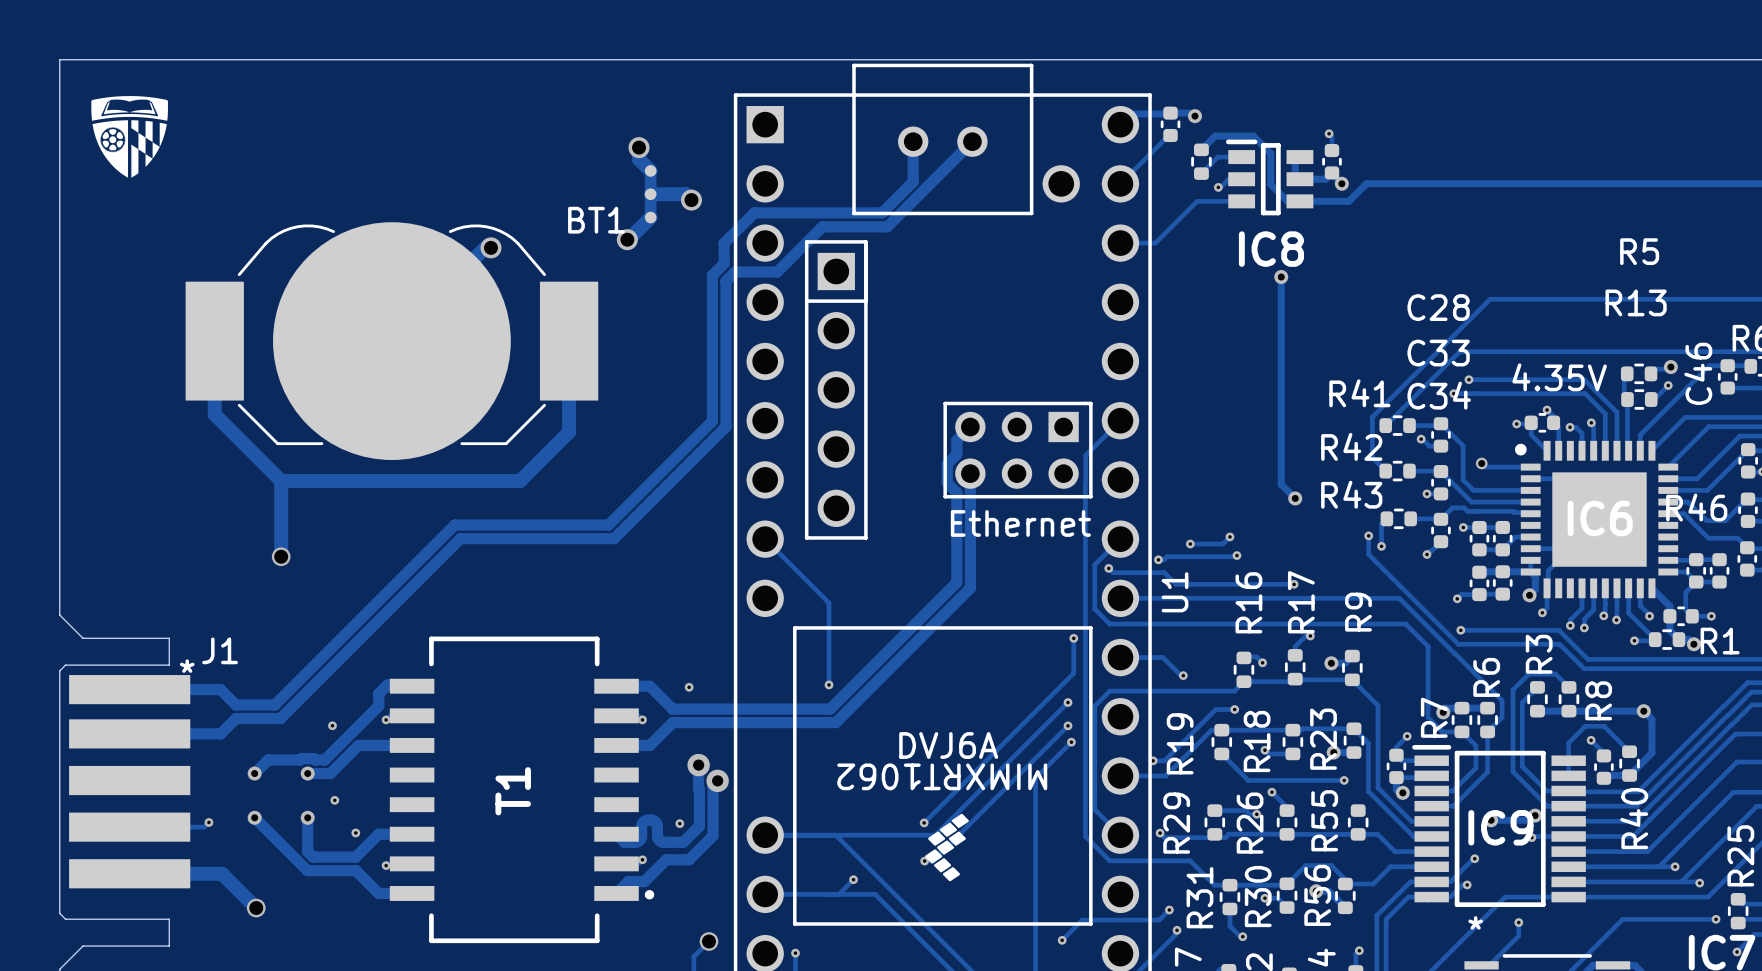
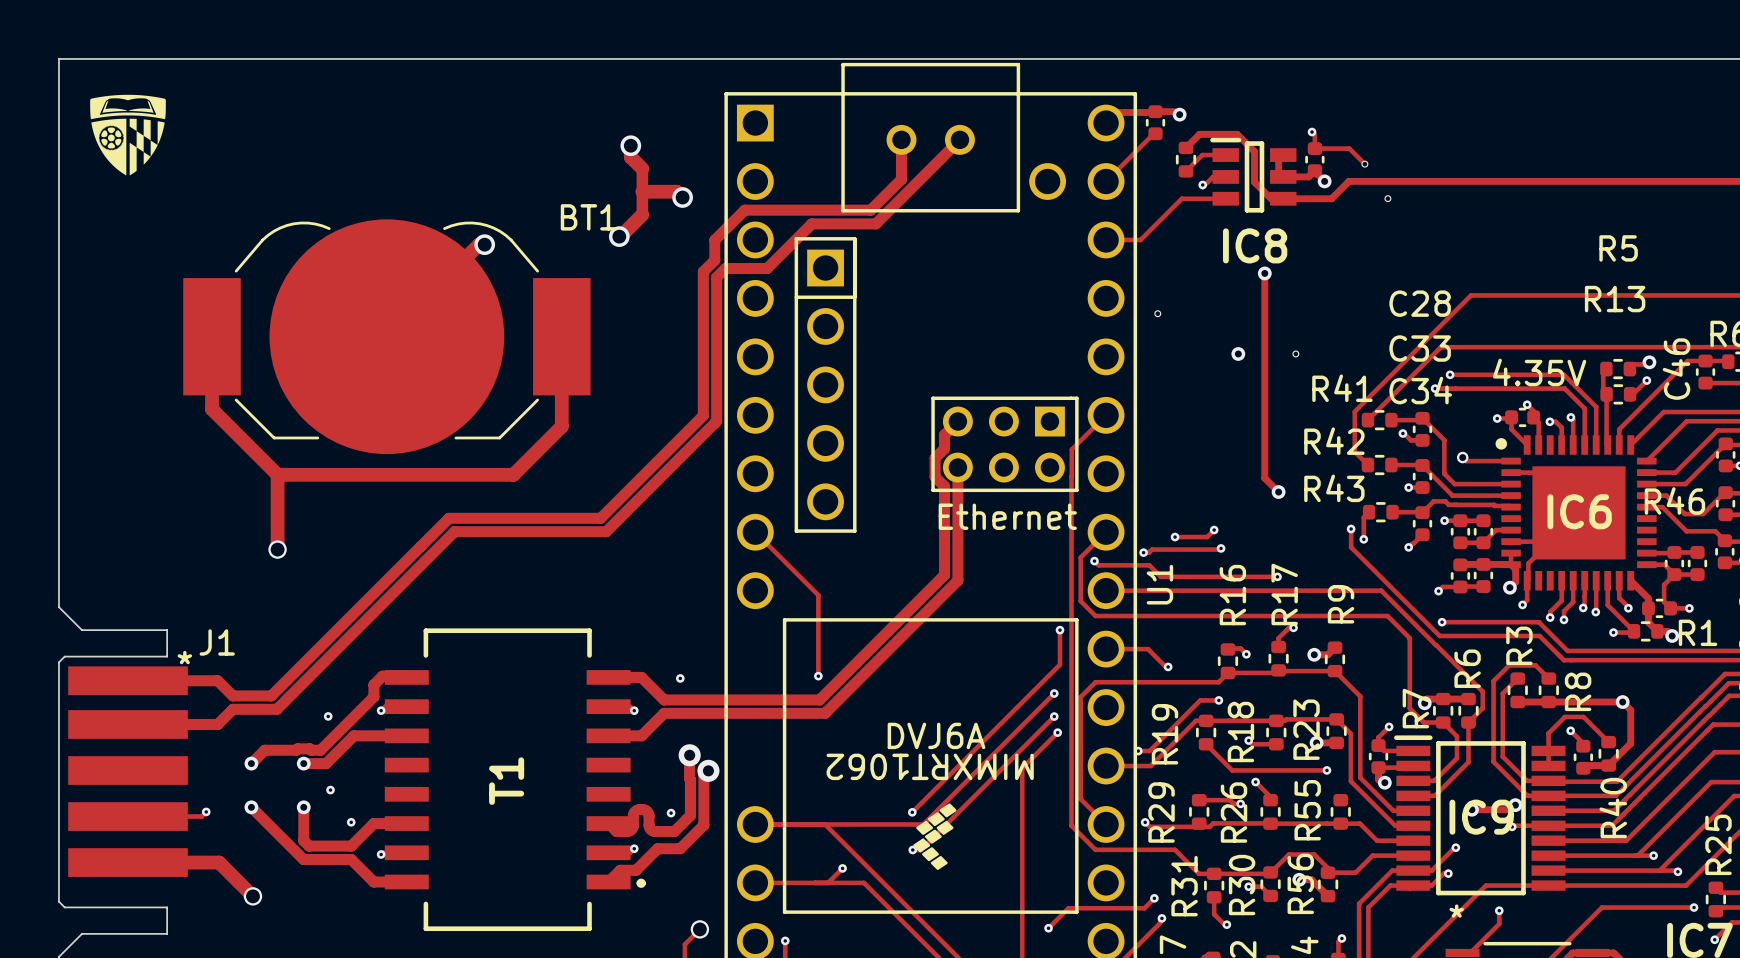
track: none -> (1314, 148) (1349, 148) (1364, 164)
via: none -> (1364, 164)
via: none -> (1387, 198)
via: none -> (1157, 313)
via: none -> (1238, 353)
via: none -> (1295, 353)

